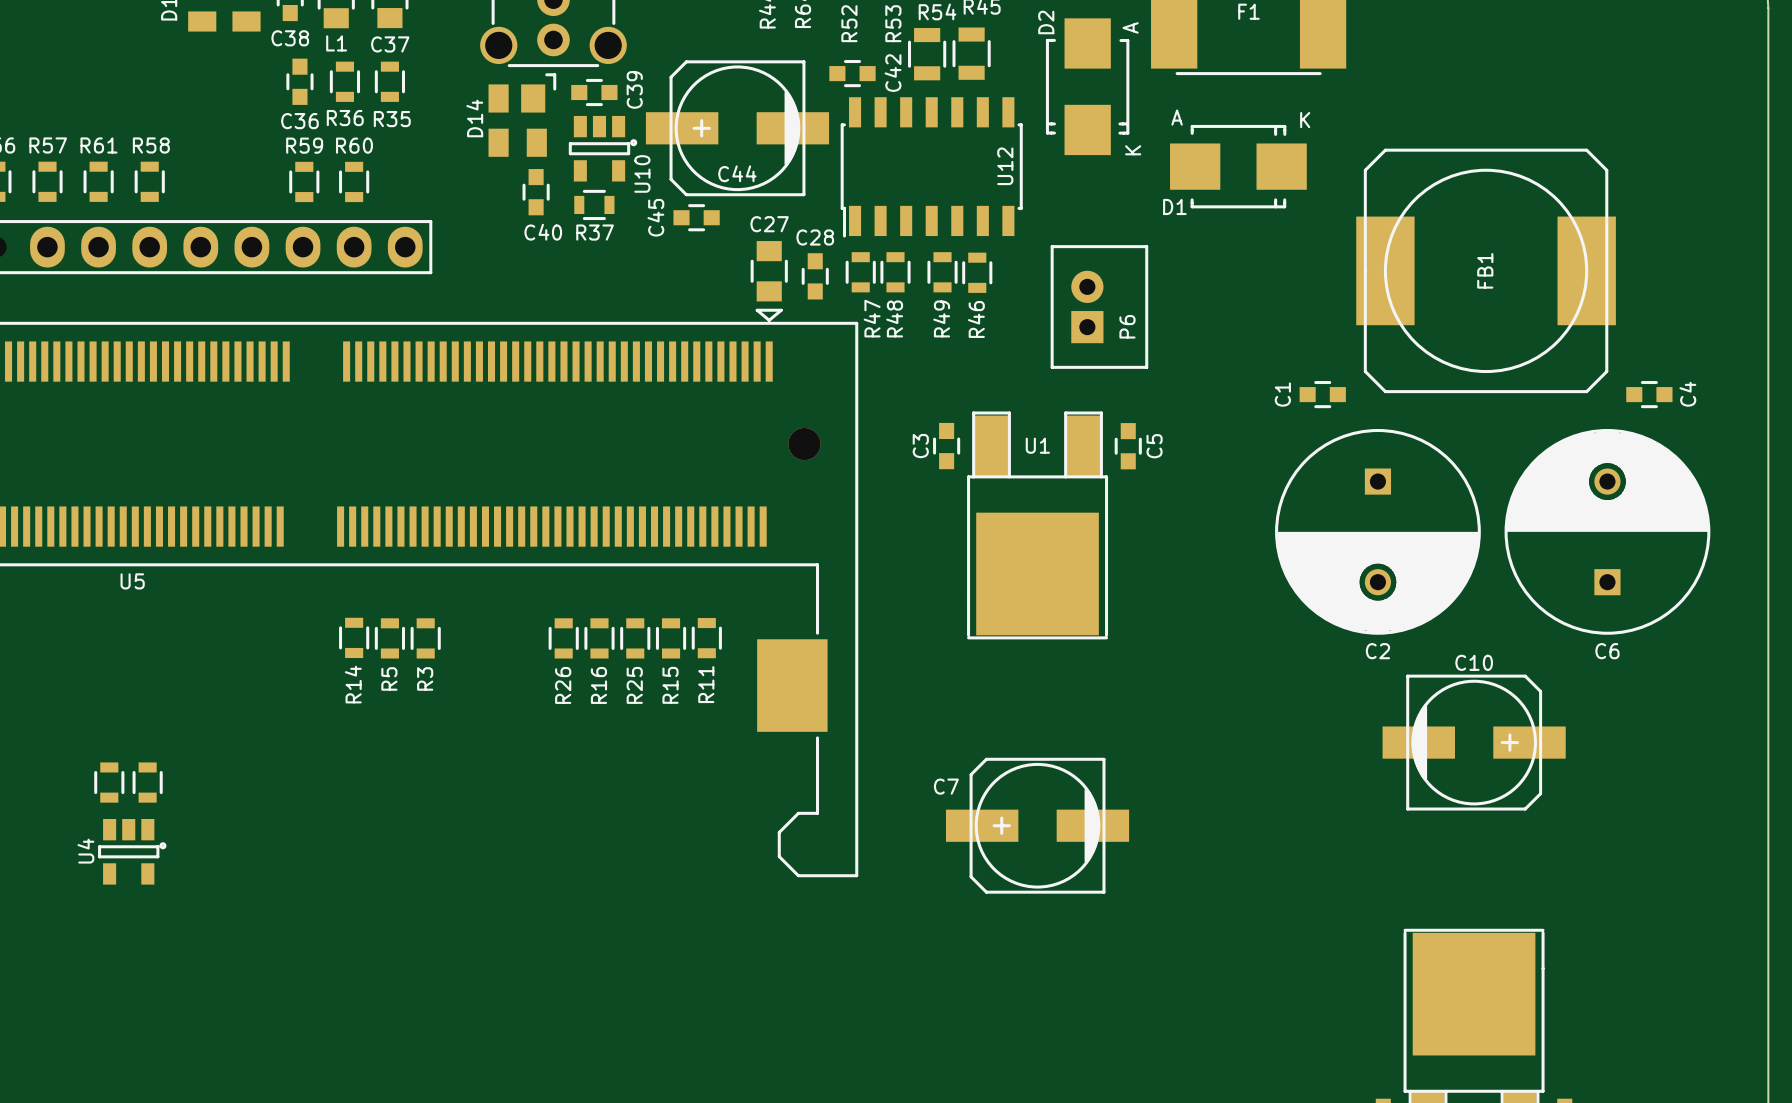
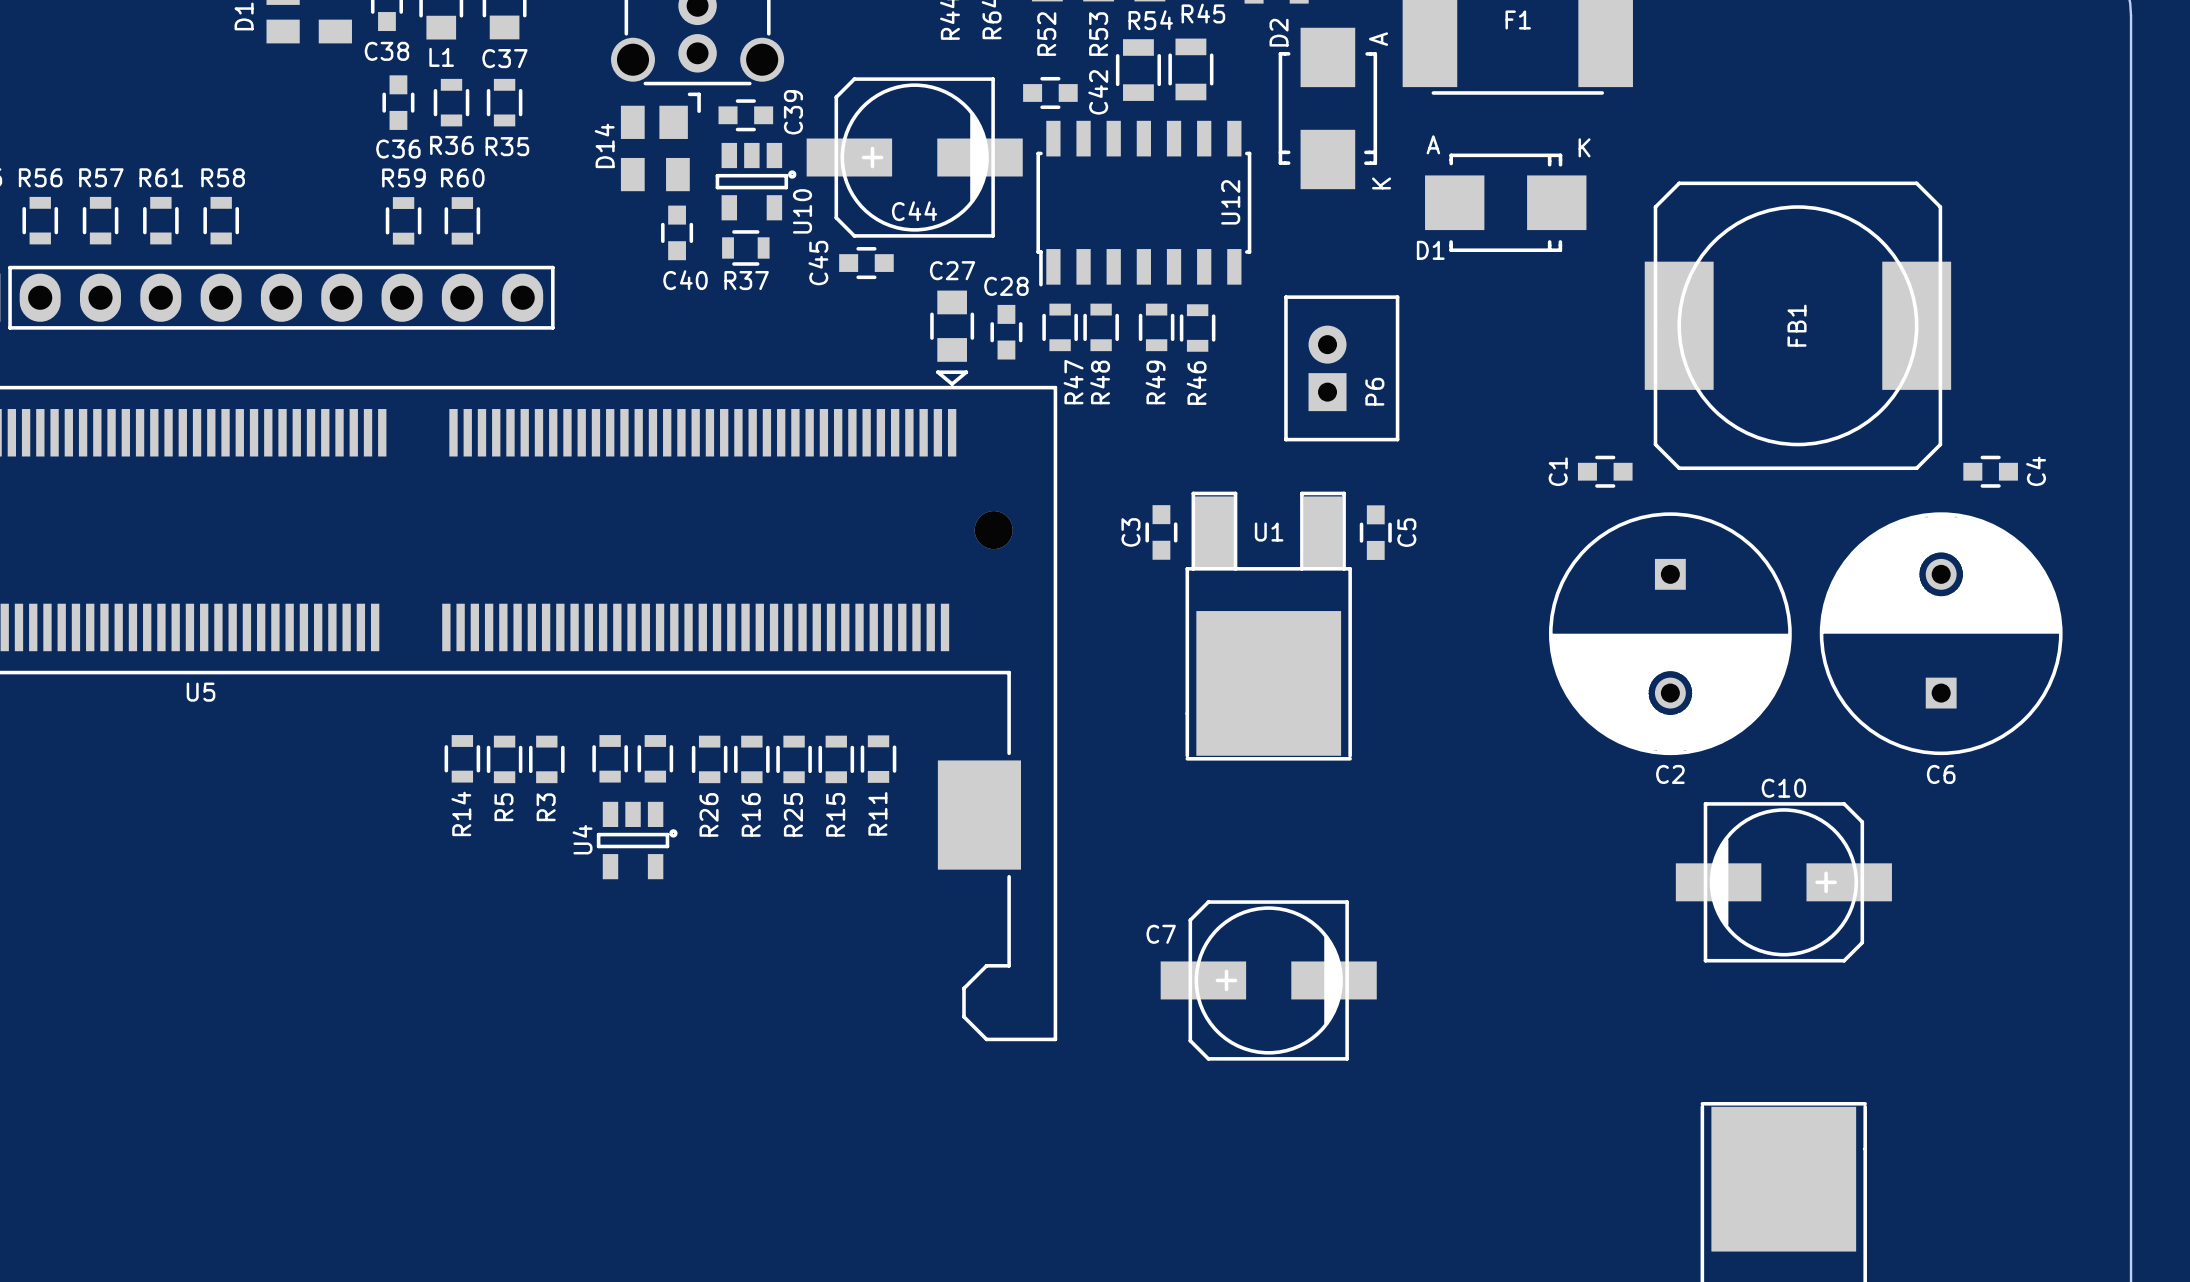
part: none -> (610, 758)
part: none -> (655, 758)
part: (109, 782) -> none
part: (147, 782) -> none
U4 position: (132, 851) -> (637, 840)

